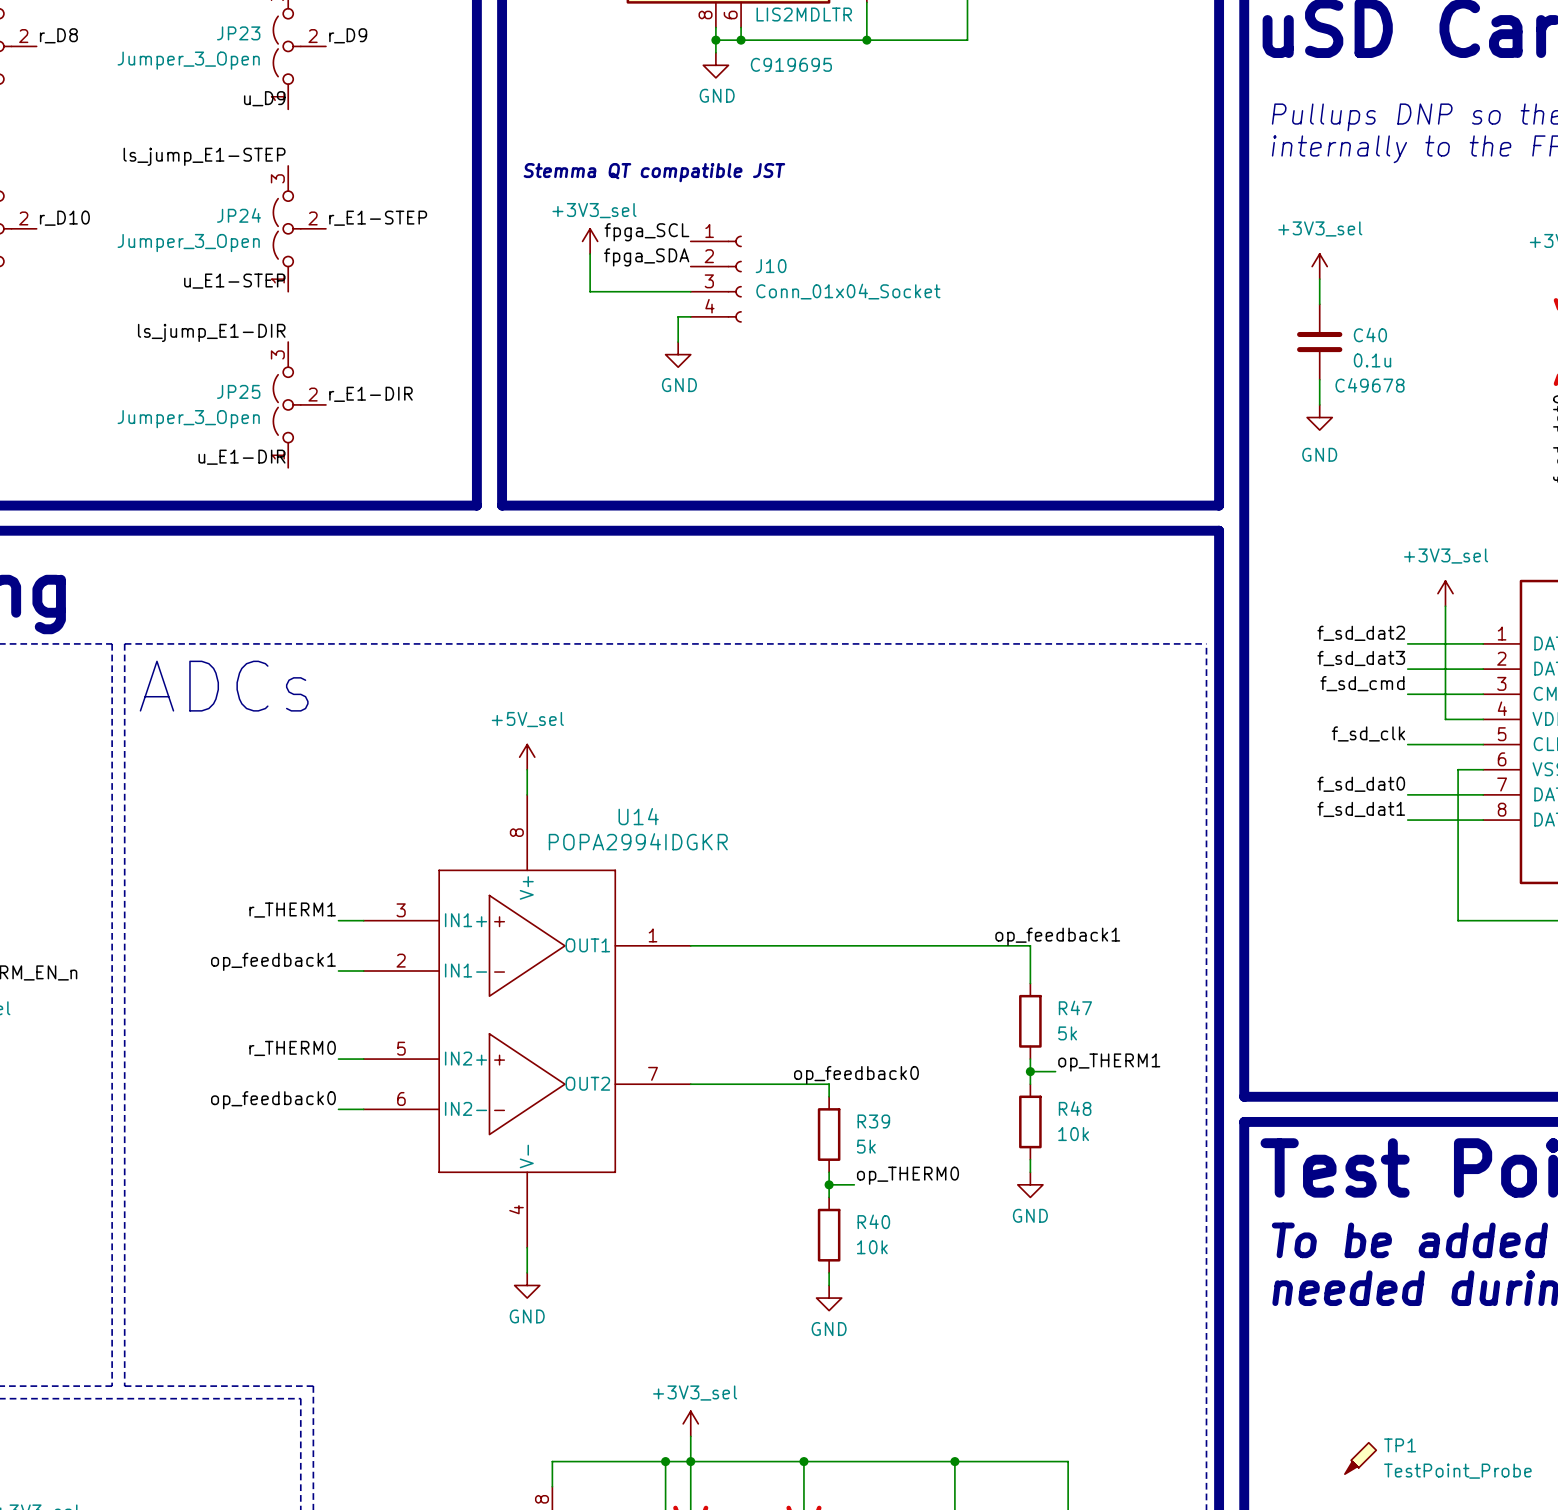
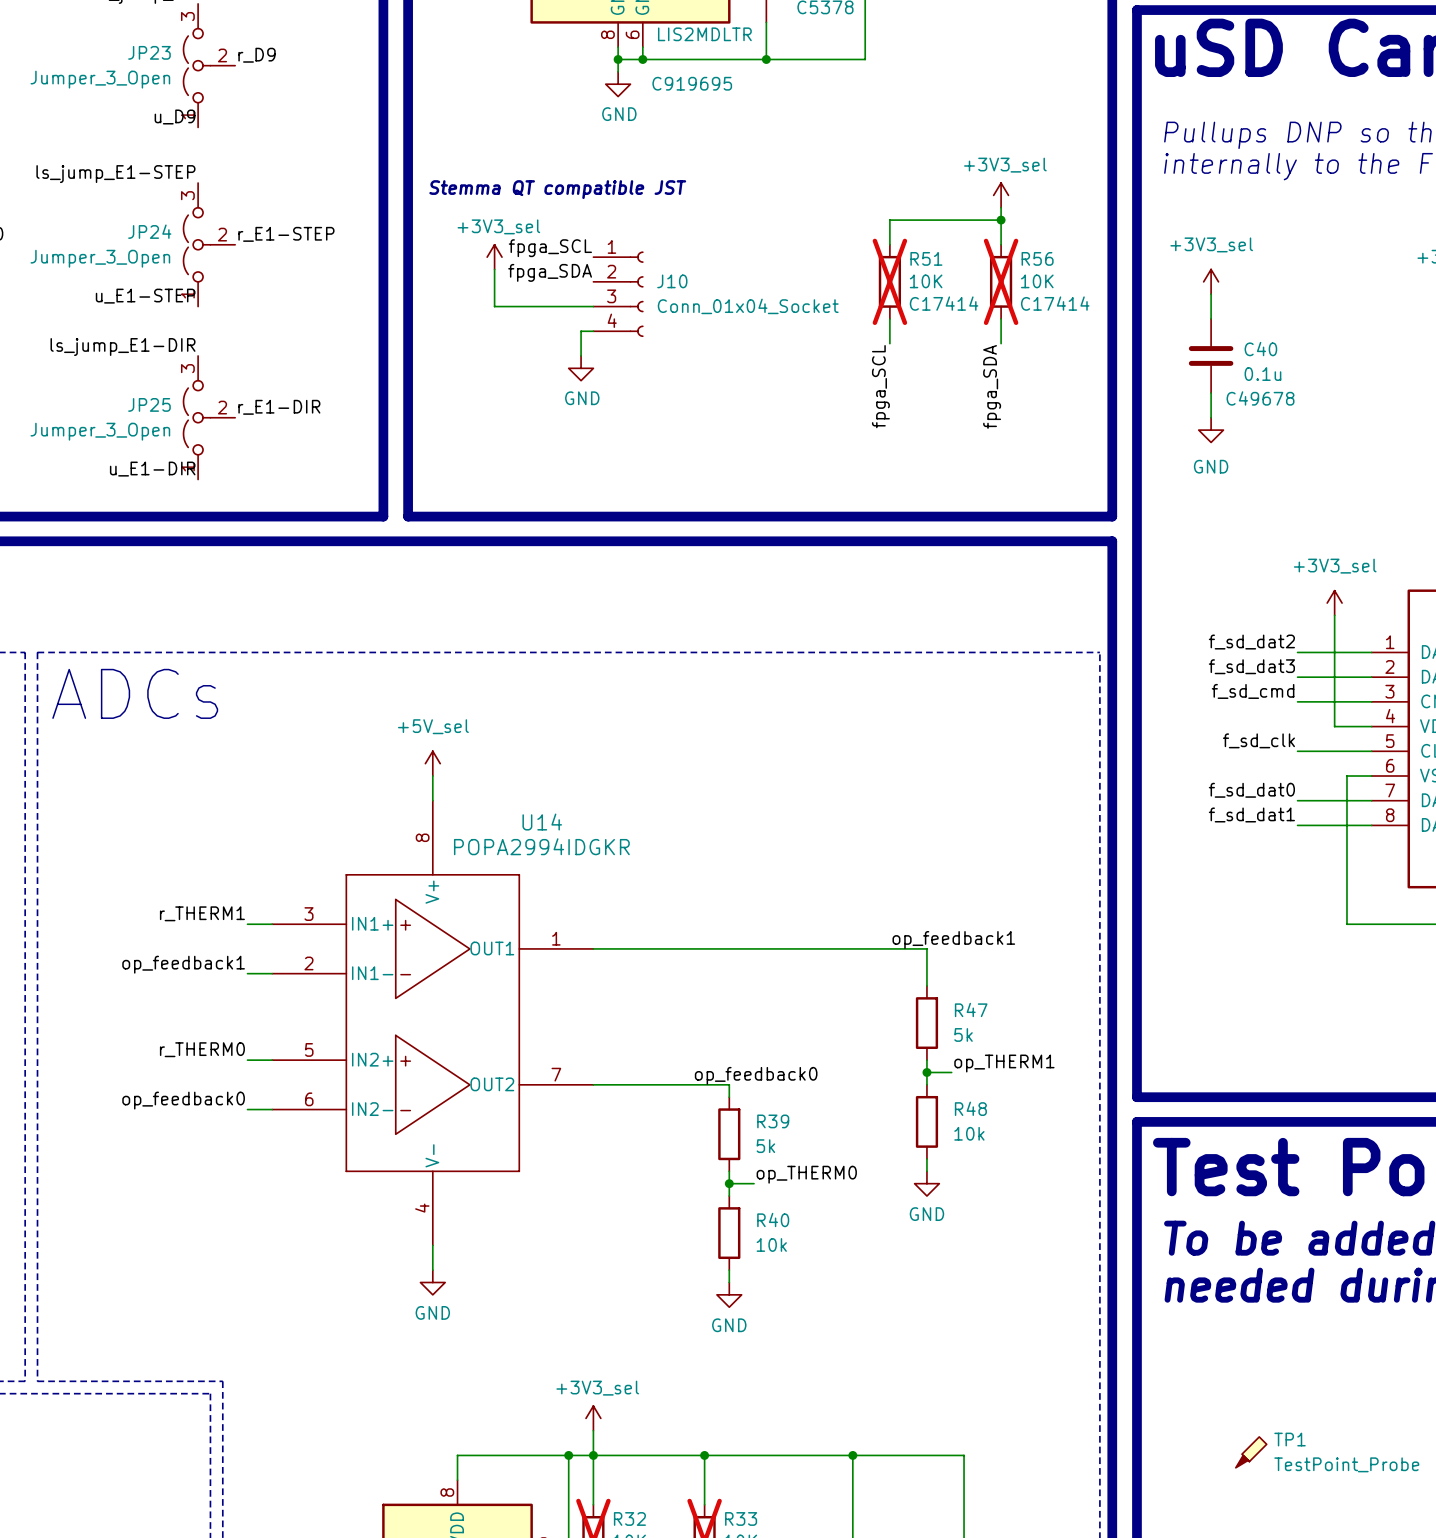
power symbol: none -> +3V3_sel (1001, 195)
wire: none -> (1001, 207) (1001, 244)
wire: none -> (1001, 220) (889, 220) (889, 244)
junction: none -> (1001, 220)
R51: none -> 10K (889, 281)
R56: none -> 10K (1001, 281)
wire: none -> (889, 318) (889, 343)
wire: none -> (1001, 318) (1001, 343)
label: none -> fpga_SCL (880, 386)
label: none -> fpga_SDA (992, 386)

